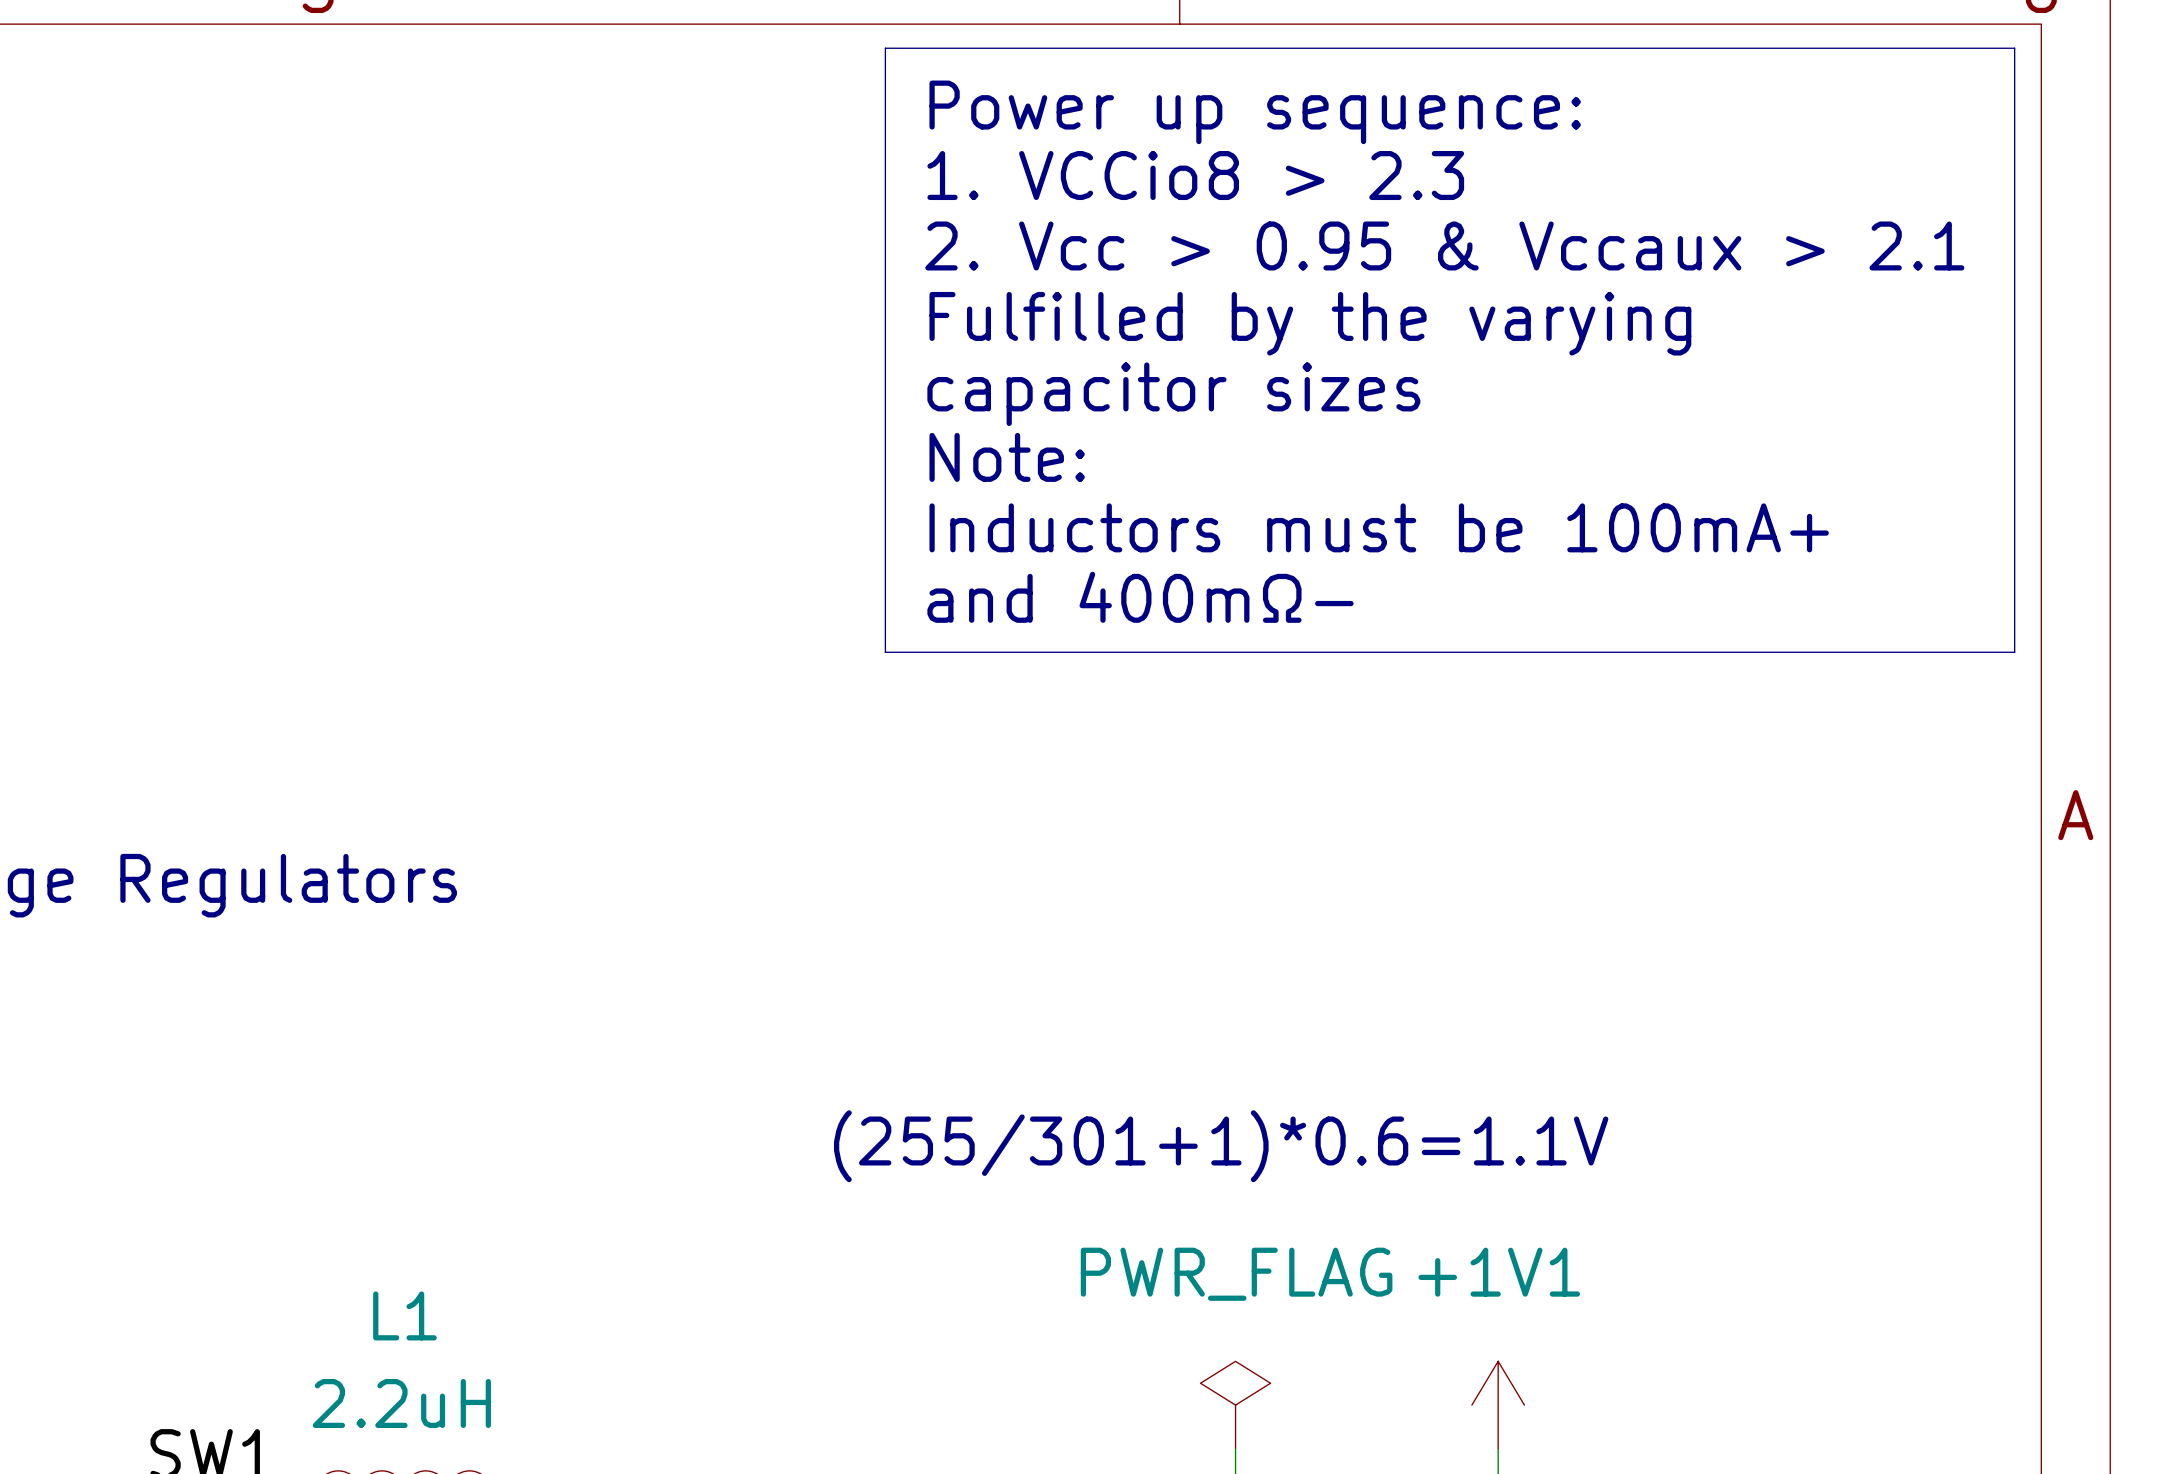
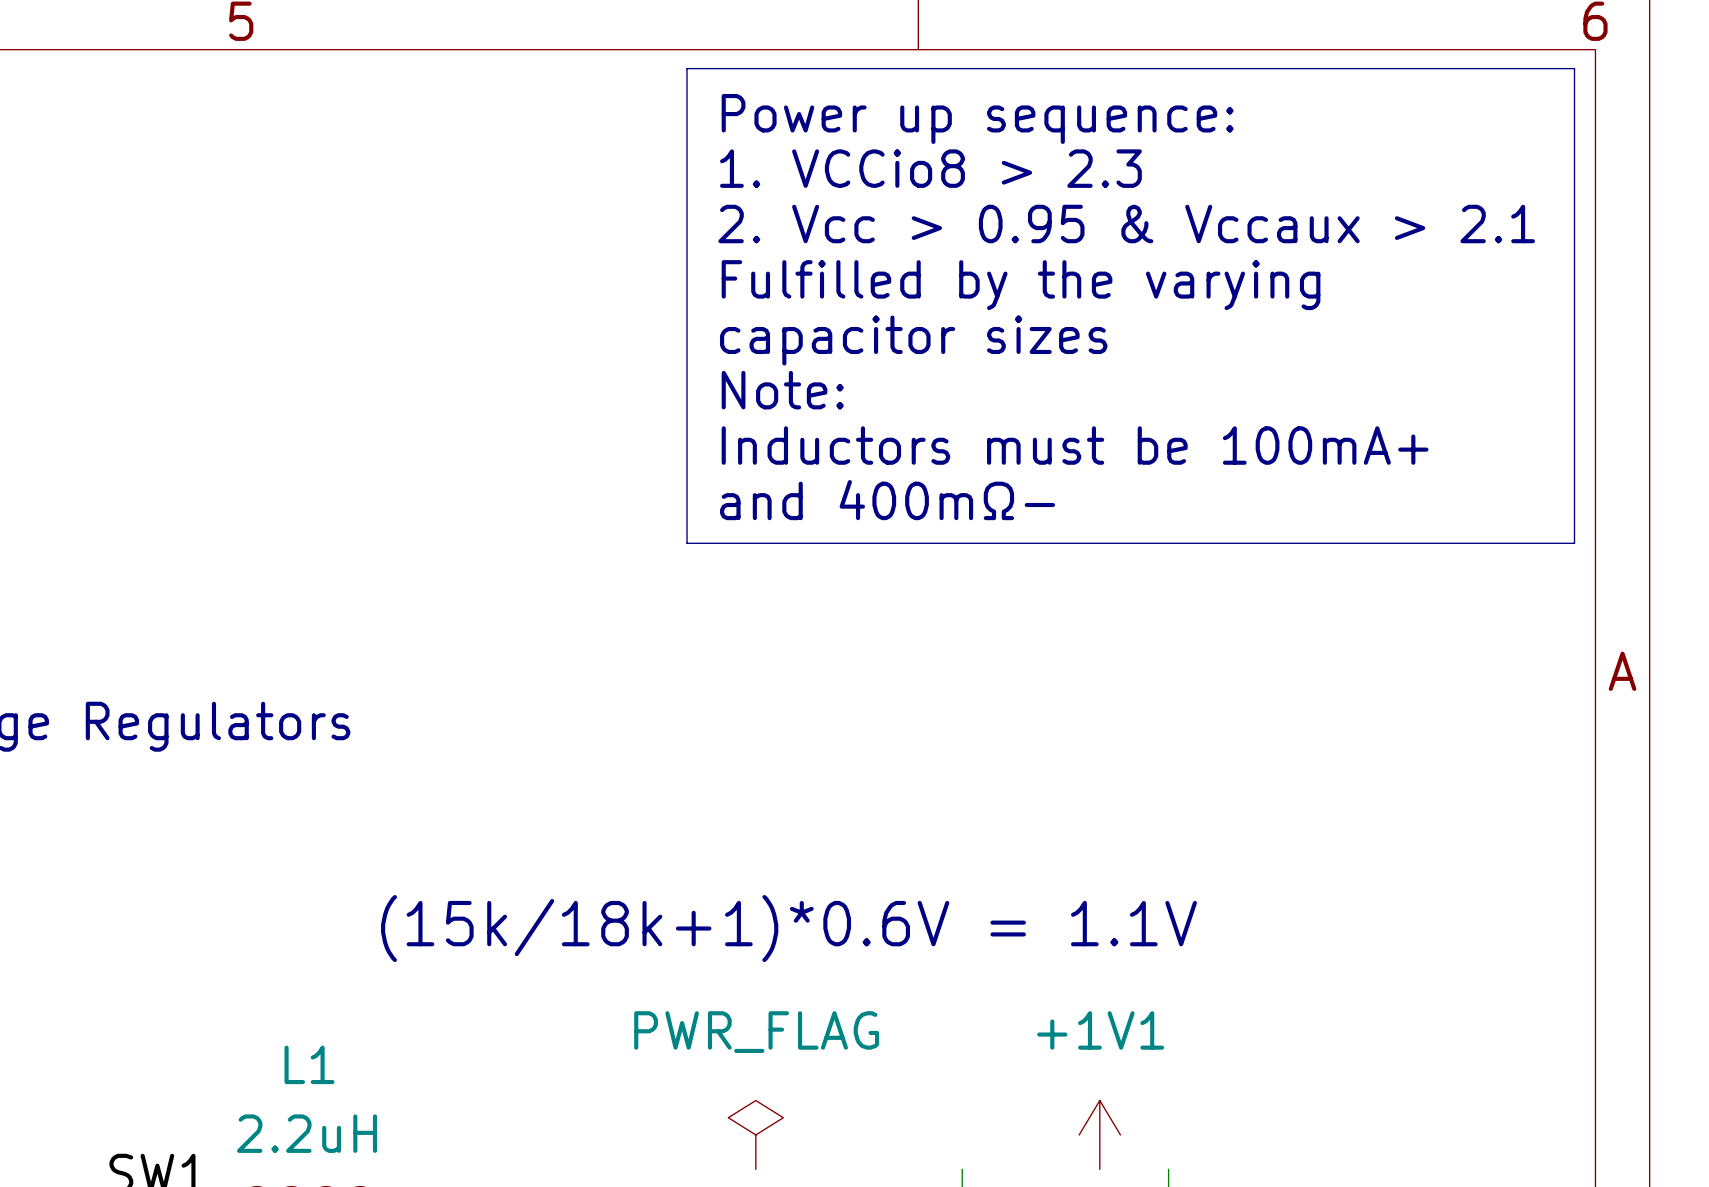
text: (255/301+1)*0.6=1.1V (1221, 1146) -> (15k/18k+1)*0.6V = 1.1V (789, 928)
power symbol position: PWR_FLAG (1235, 1405) -> PWR_FLAG (755, 1134)
power symbol position: +1V1 (1498, 1405) -> +1V1 (1099, 1134)

